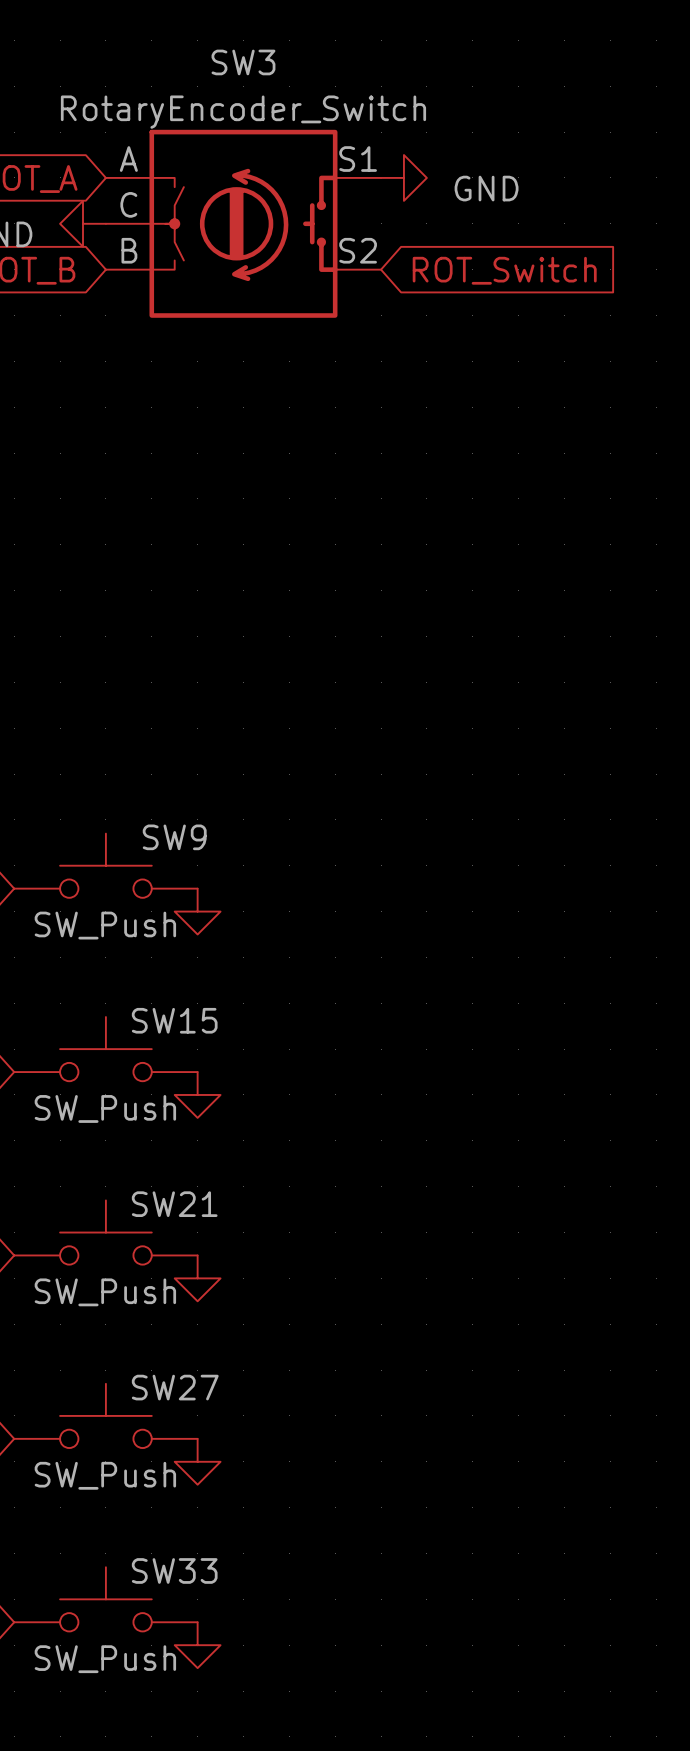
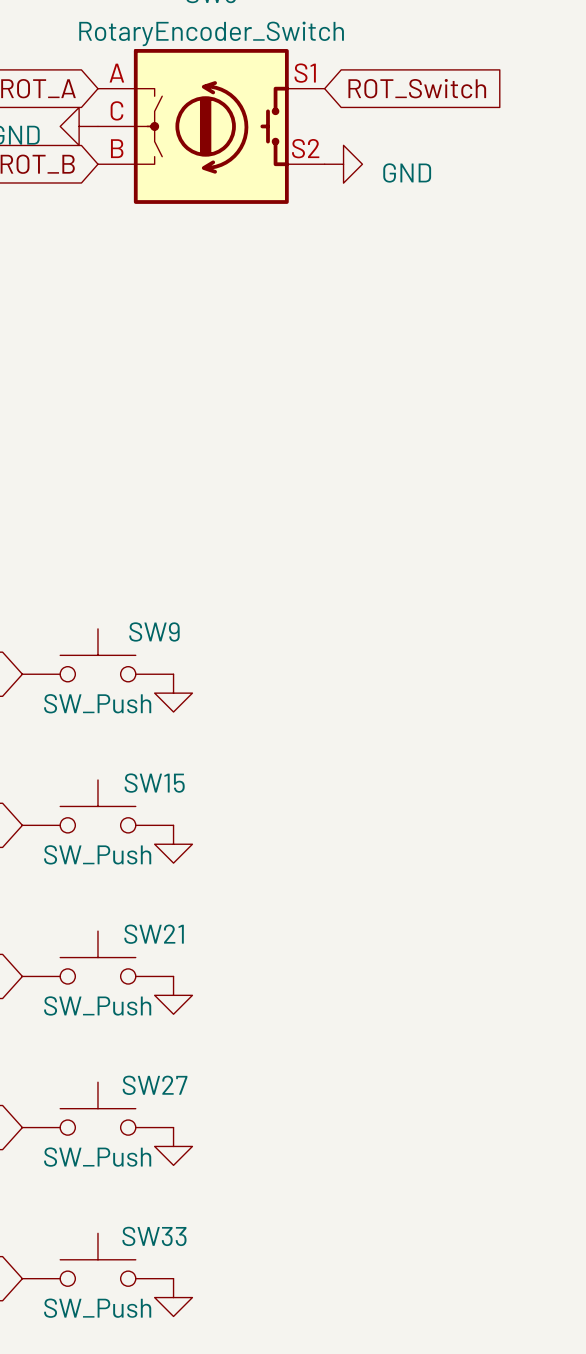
power symbol position: GND (403, 177) -> GND (343, 164)
global label position: ROT_Switch (504, 270) -> ROT_Switch (417, 88)

